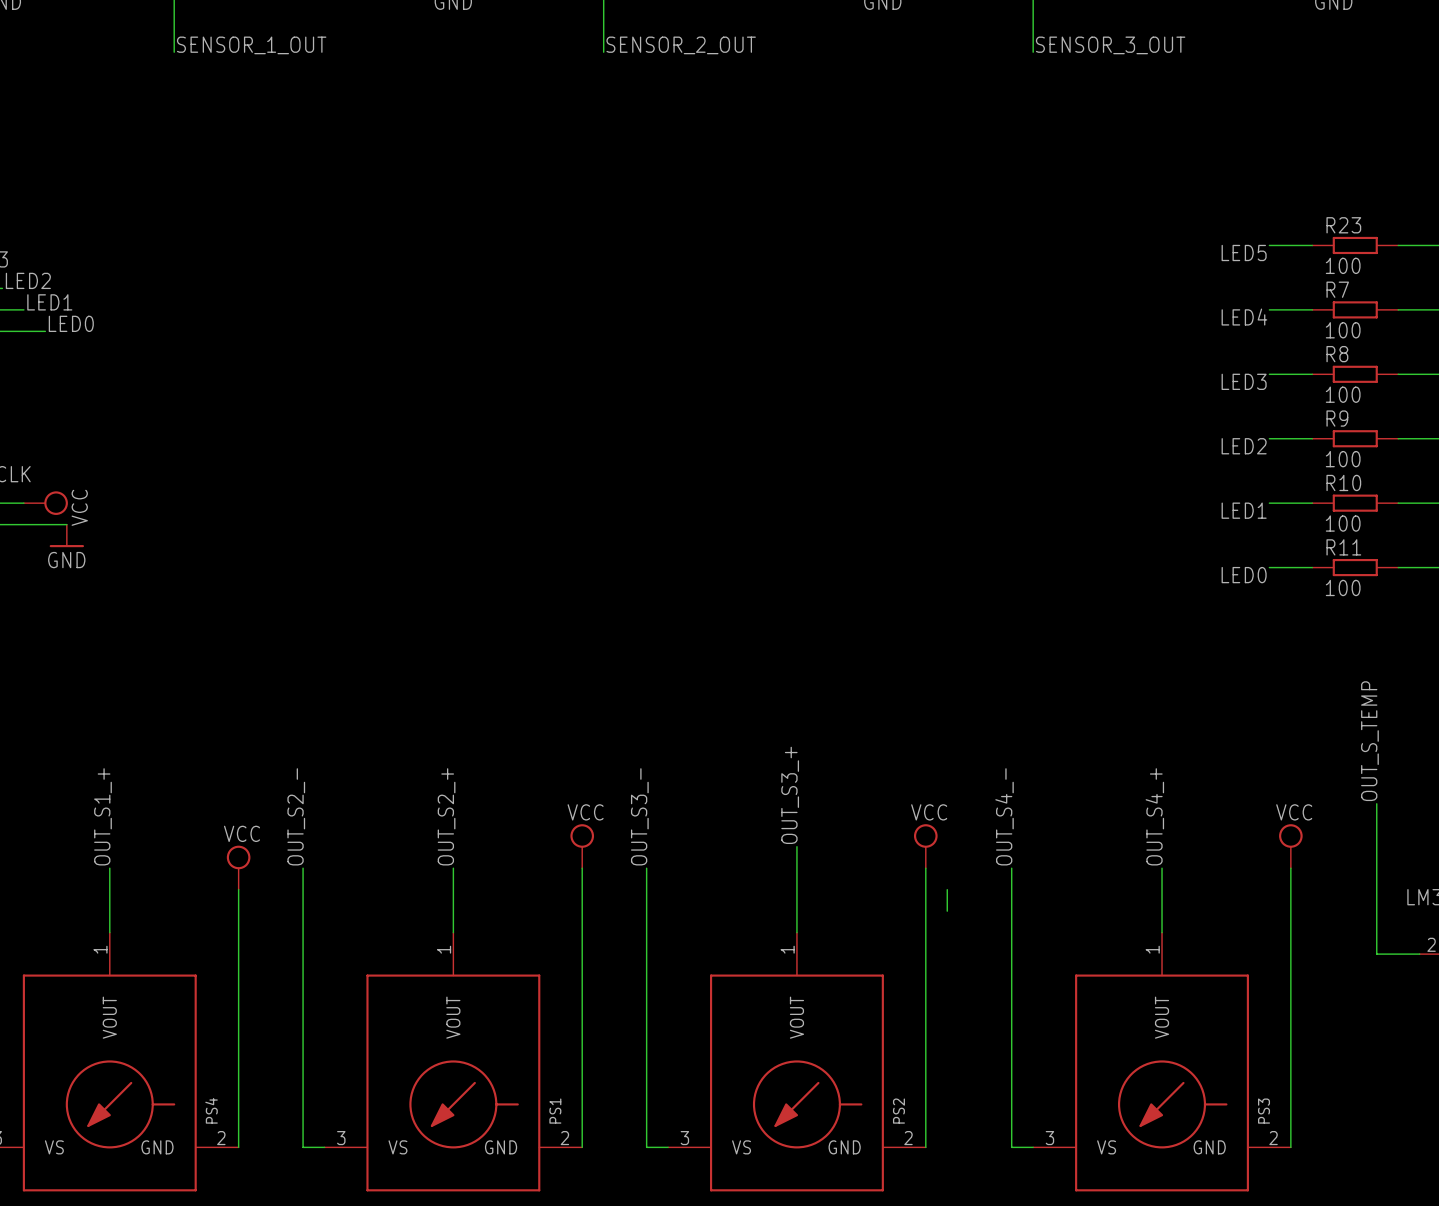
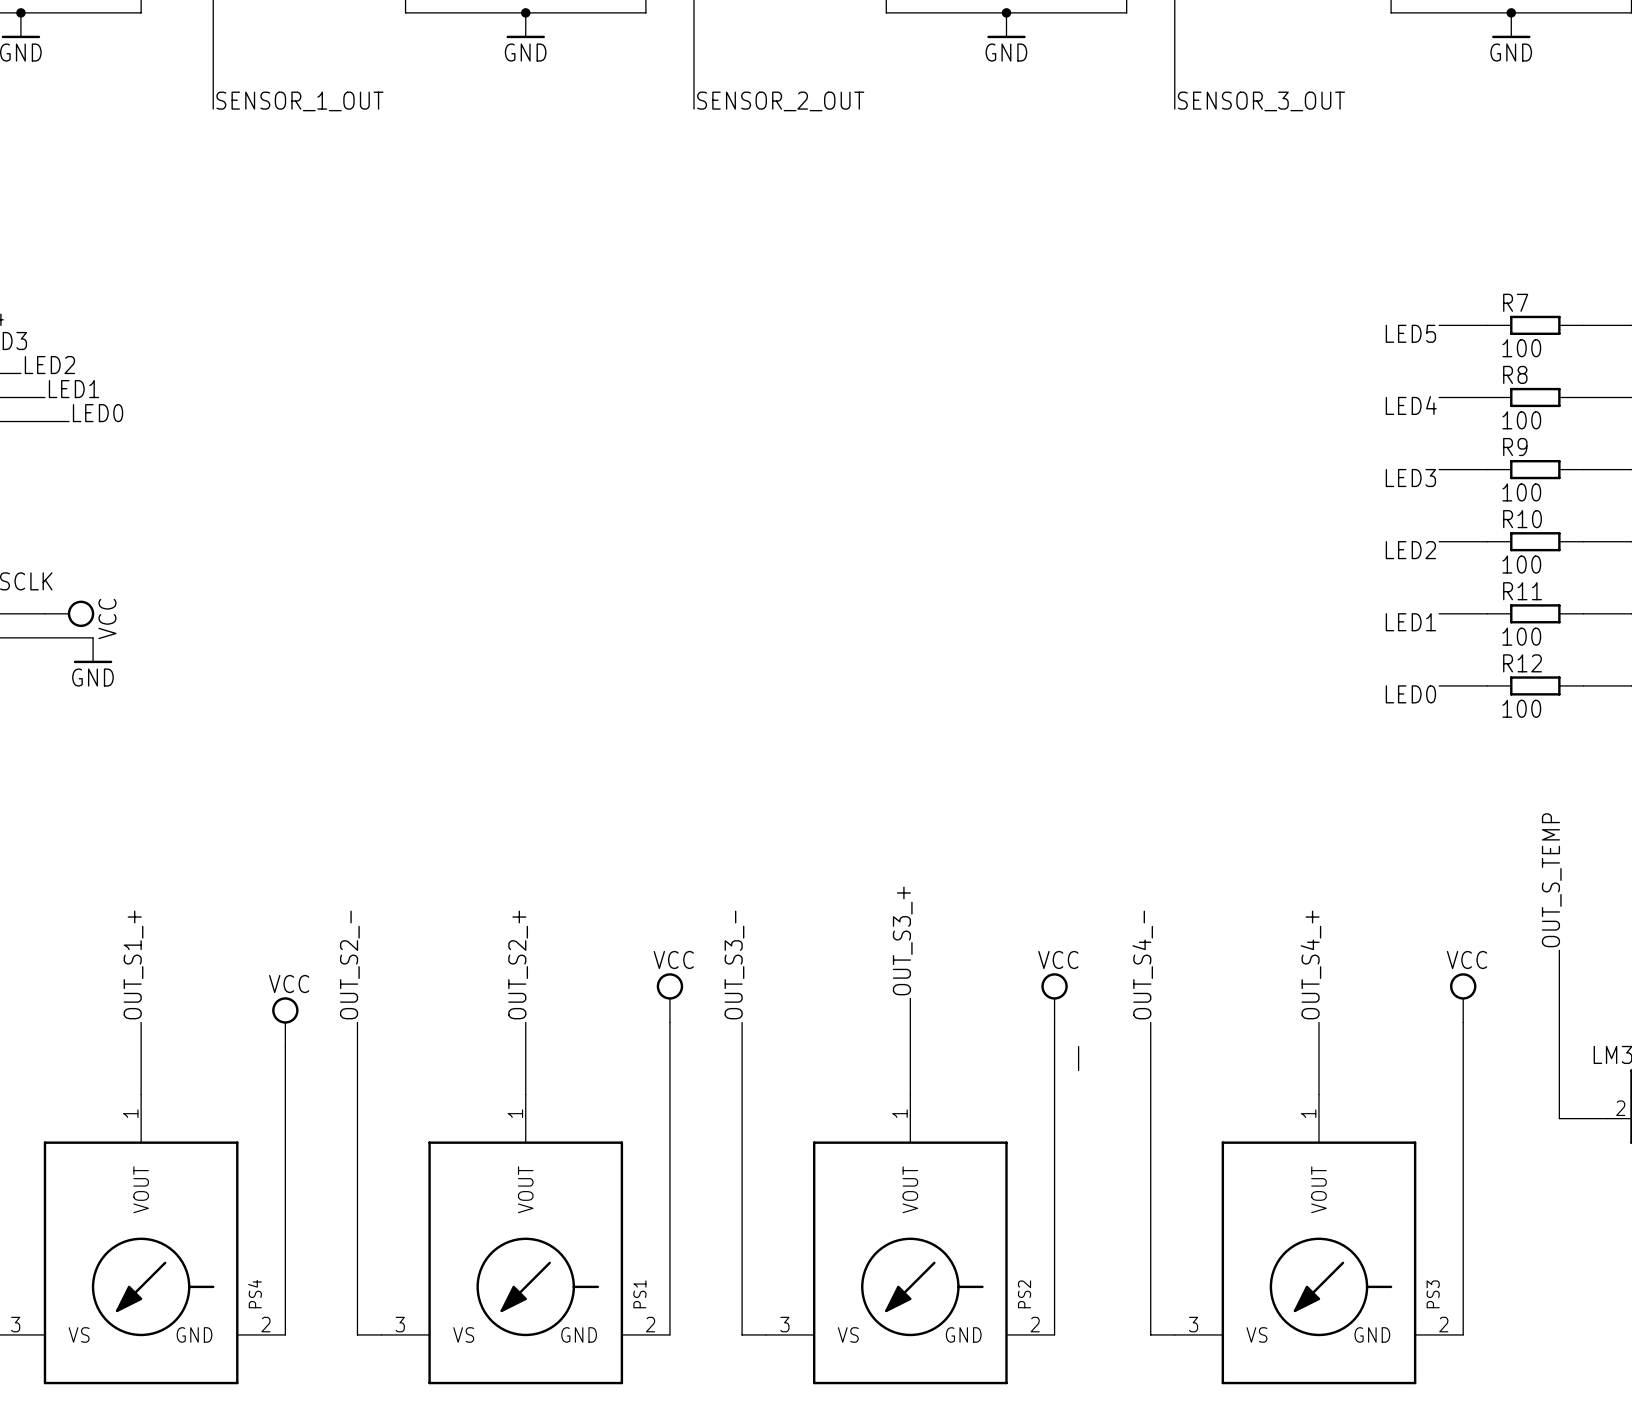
R23 name: R23 (1343, 225) -> R7 (1515, 302)
R7 name: R7 (1337, 289) -> R8 (1515, 374)
R8 name: R8 (1337, 354) -> R9 (1515, 447)
R9 name: R9 (1337, 418) -> R10 (1522, 519)
R10 name: R10 (1343, 482) -> R11 (1522, 591)
R11 name: R11 (1343, 547) -> R12 (1522, 663)

